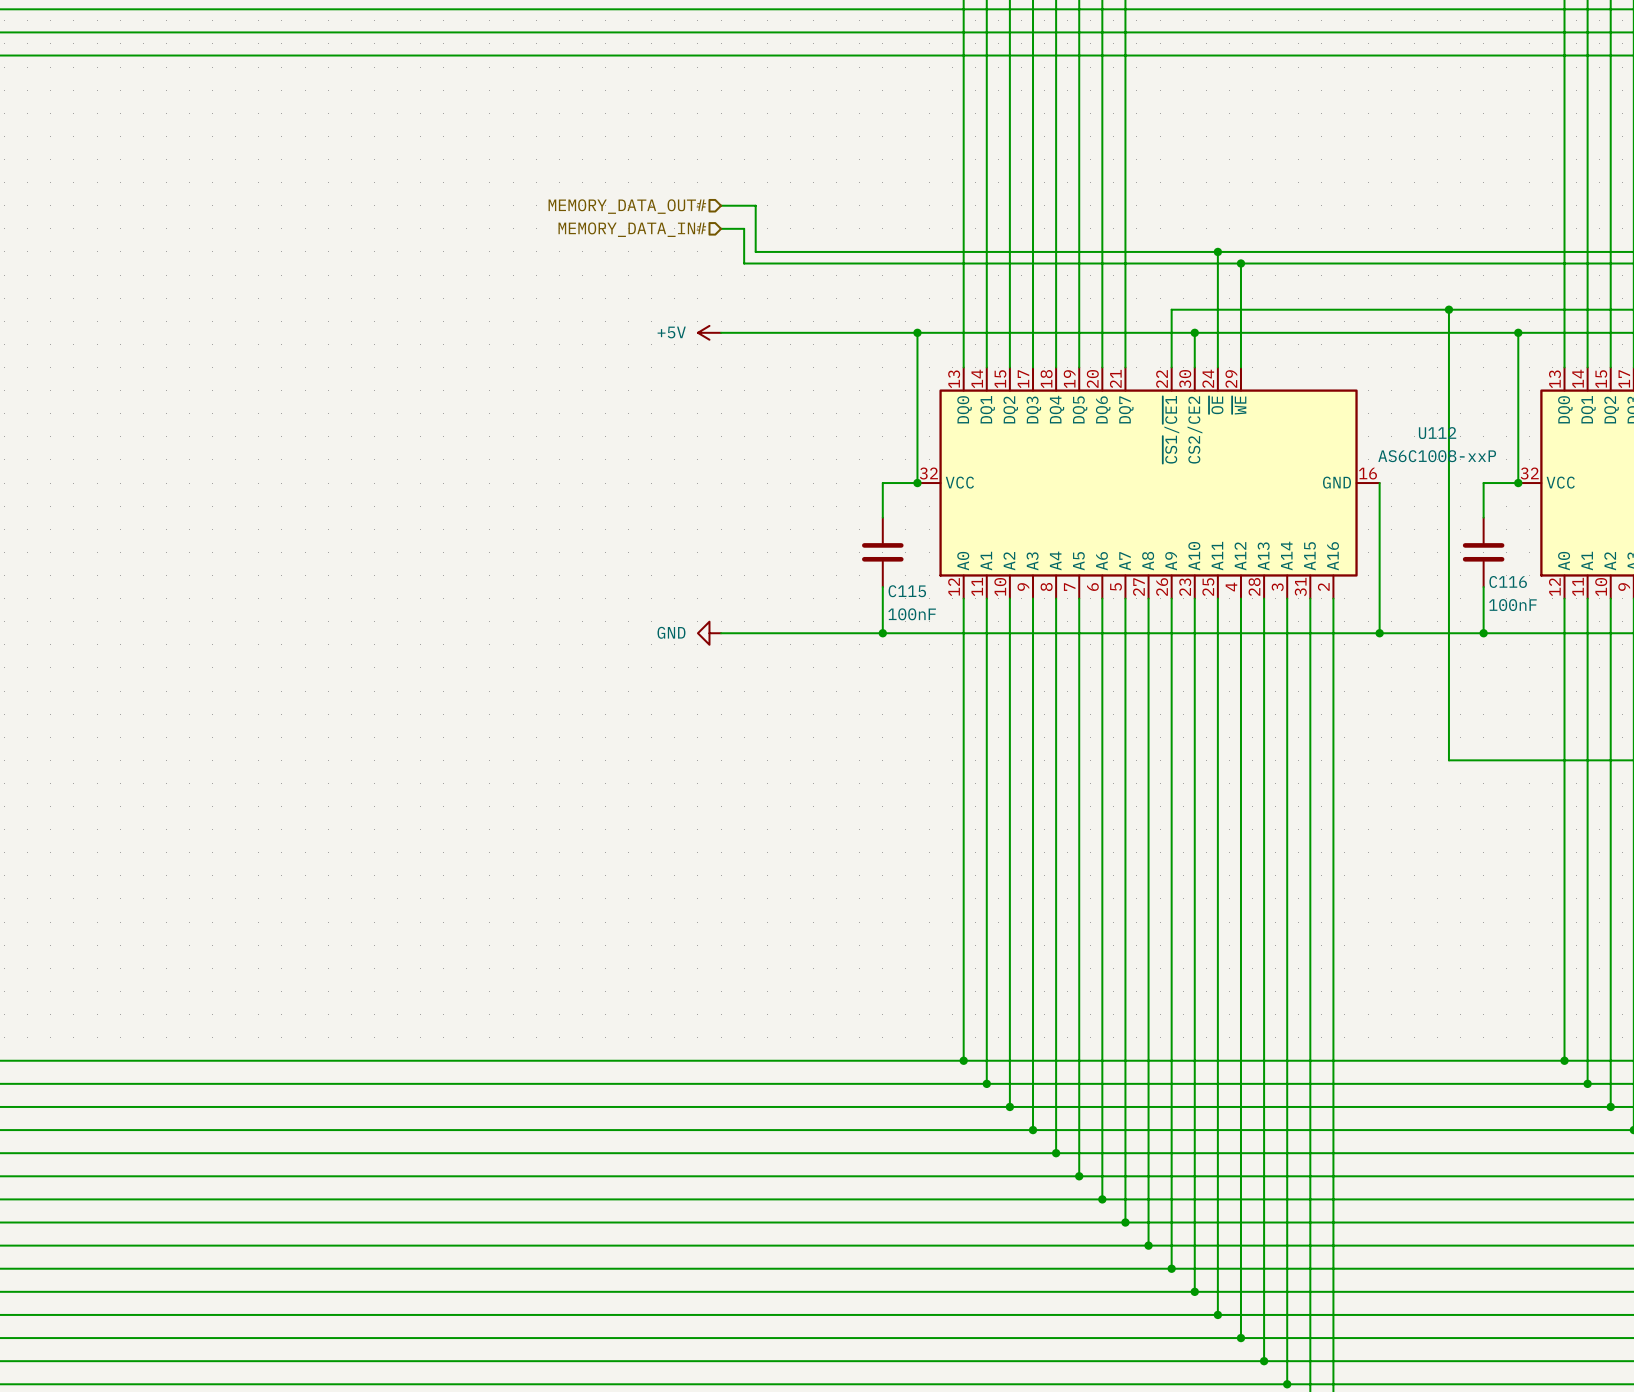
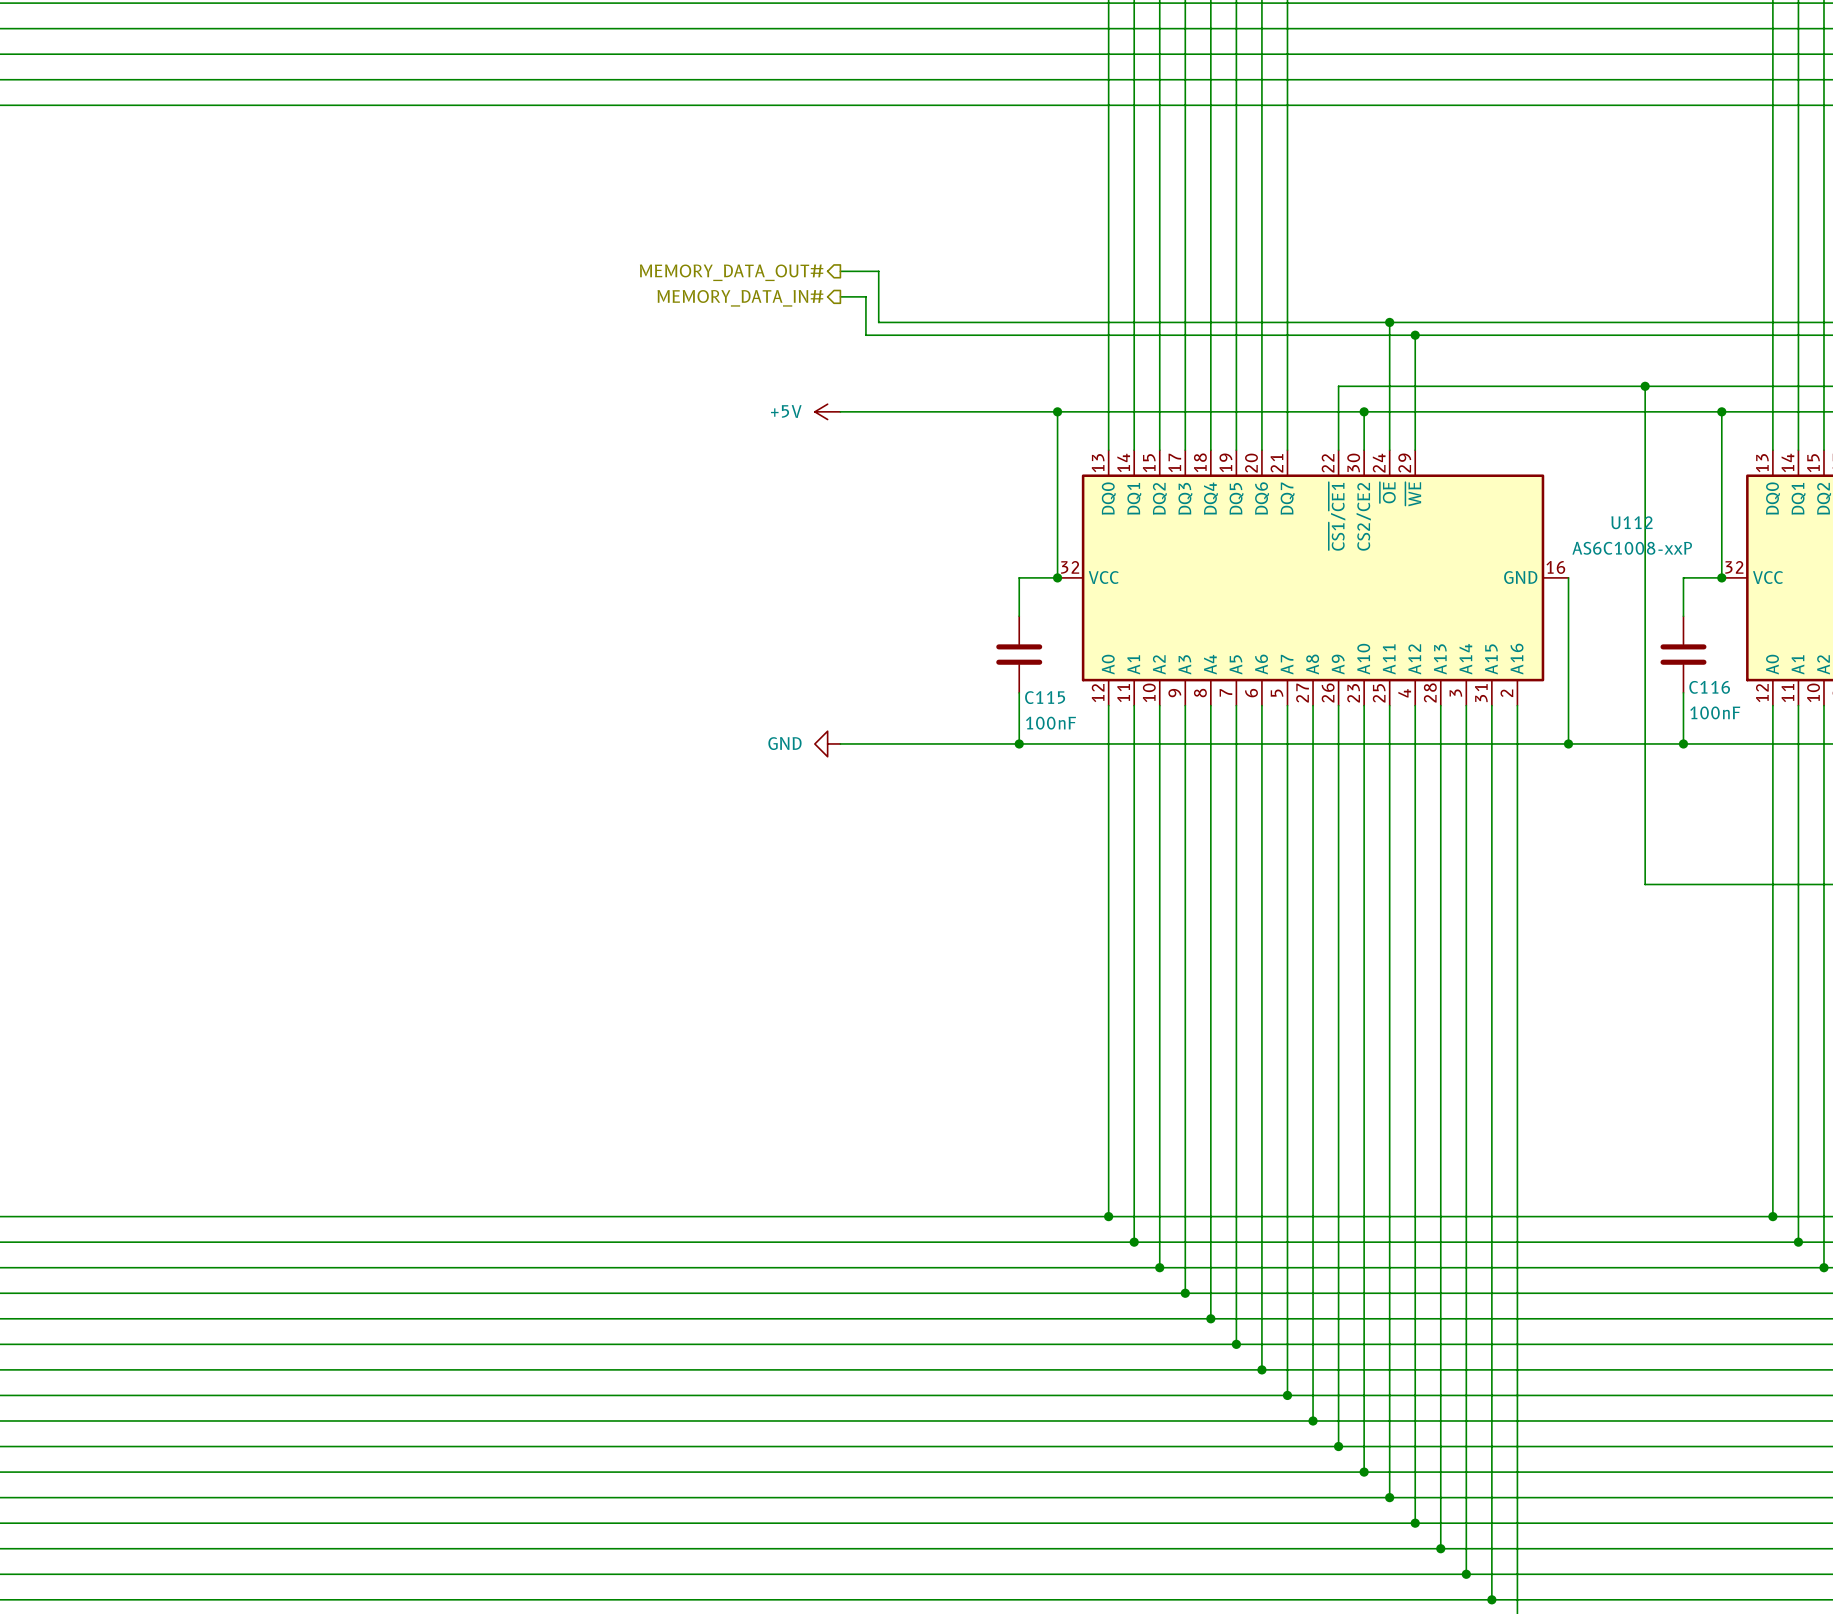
hierarchical label shape: input (627, 206) -> output (731, 272)
hierarchical label shape: input (632, 229) -> output (740, 298)

